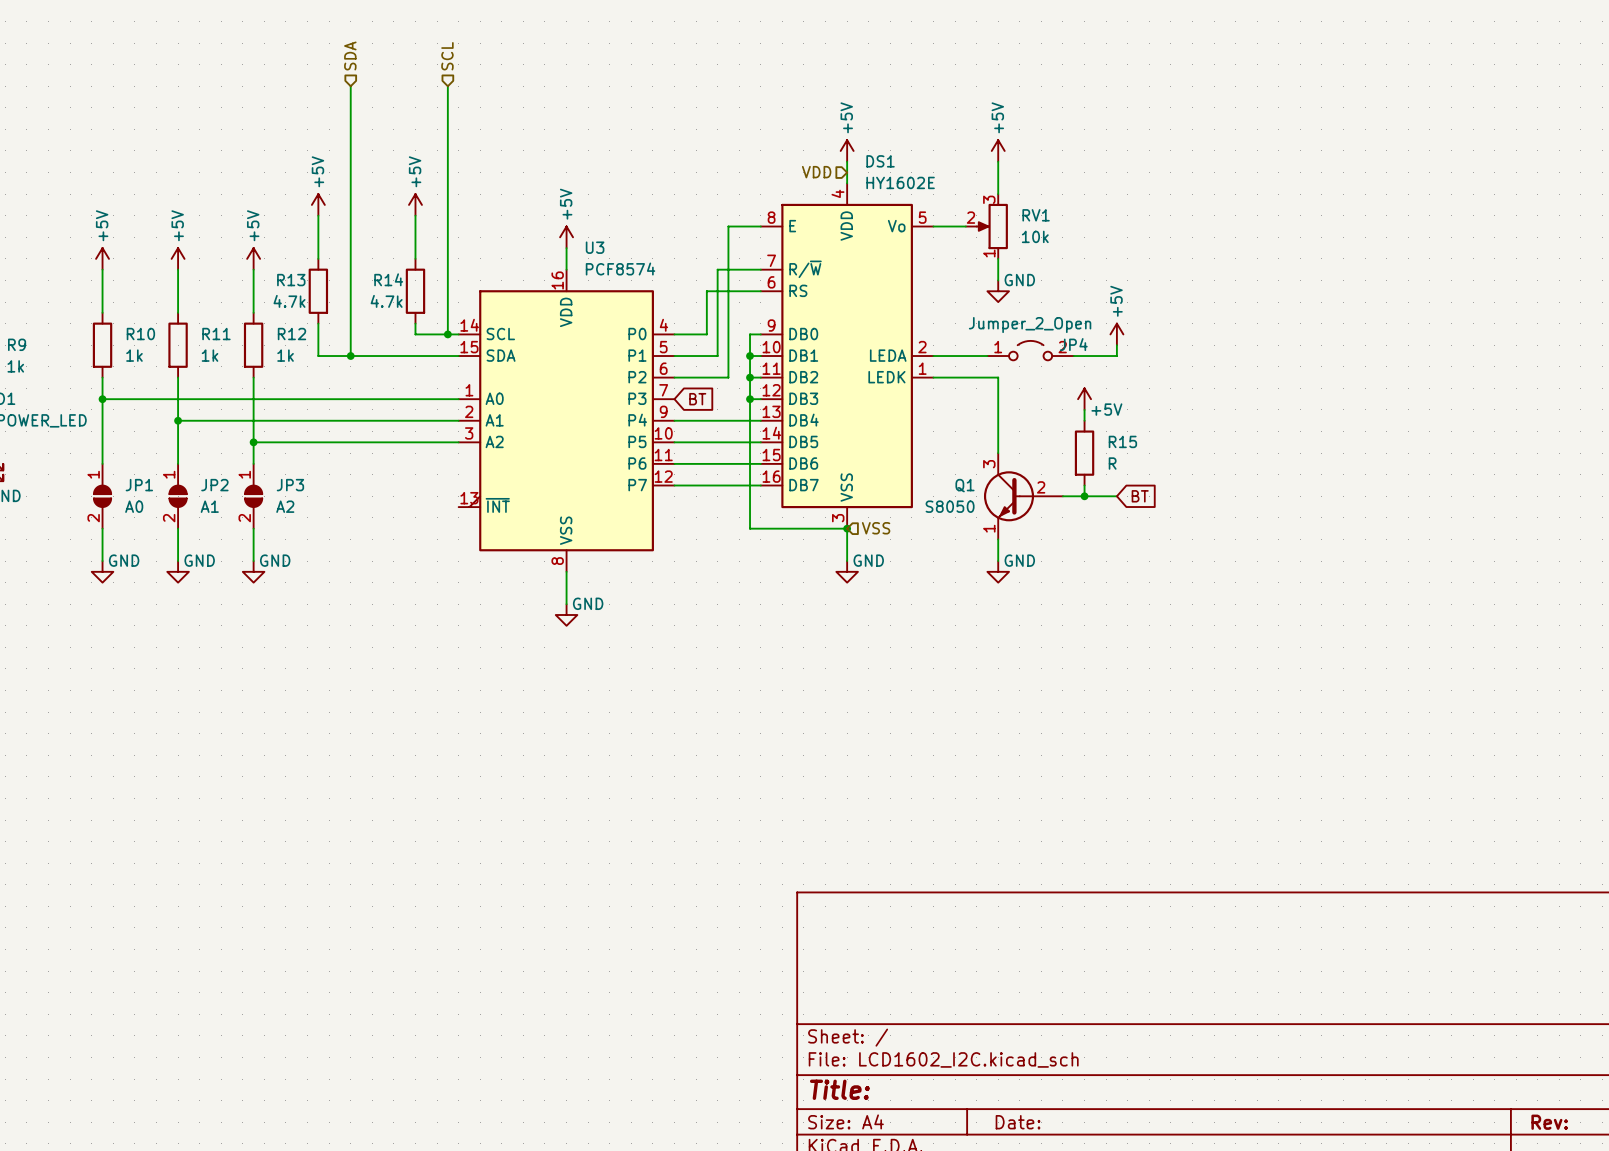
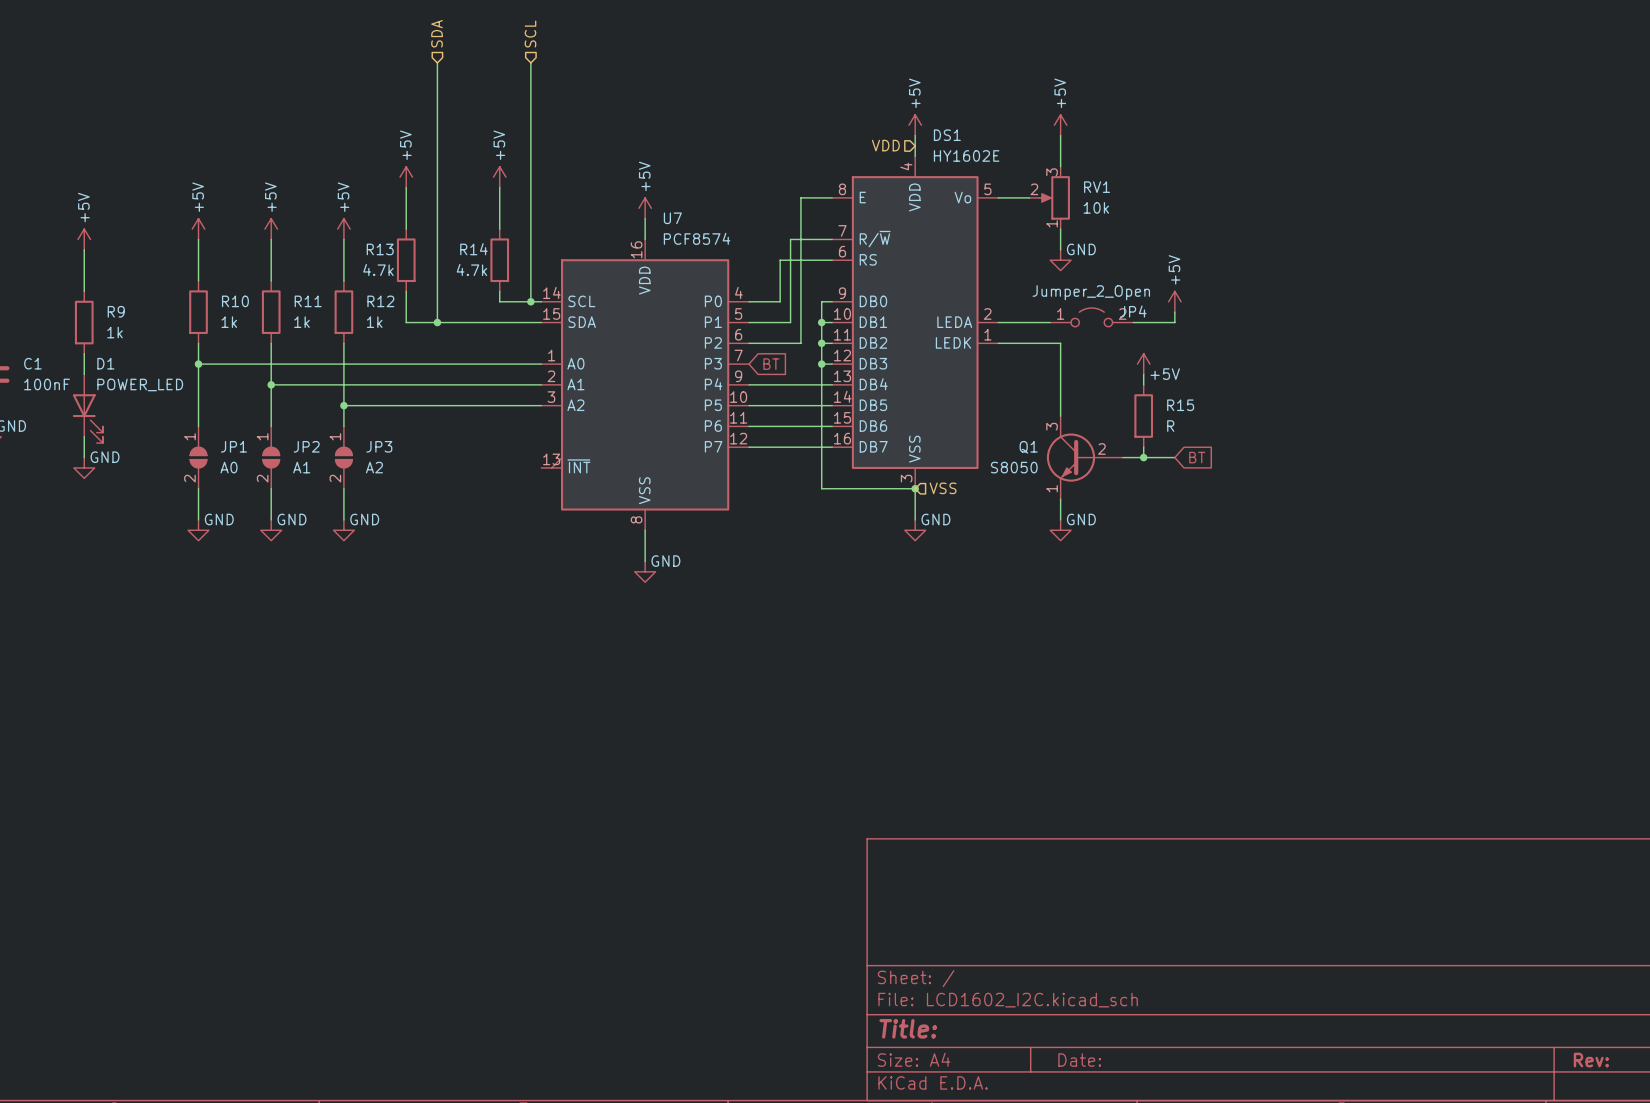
U3 name: U3 (595, 247) -> U7 (672, 218)

